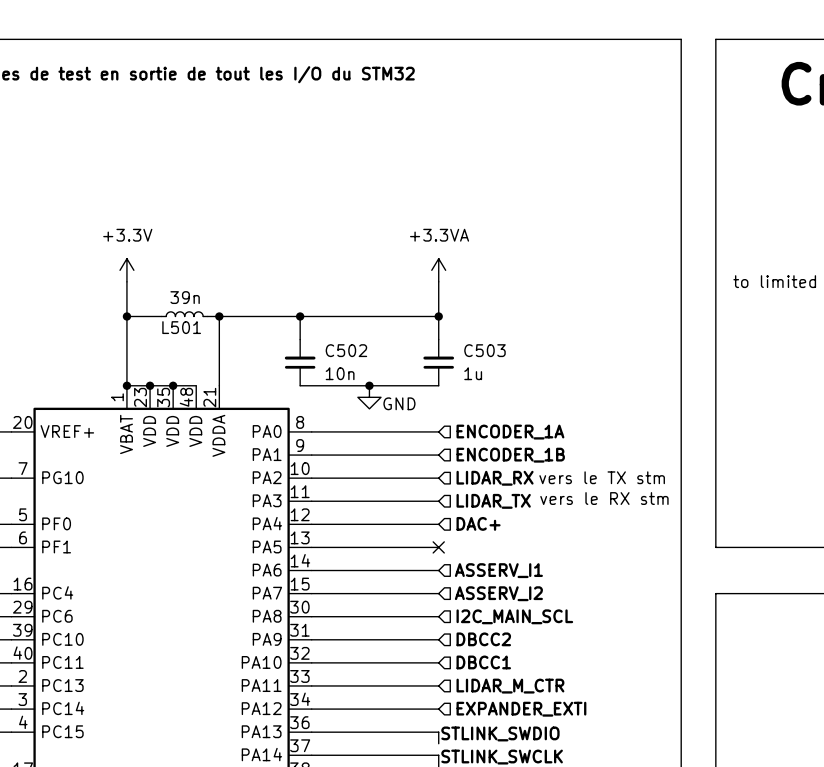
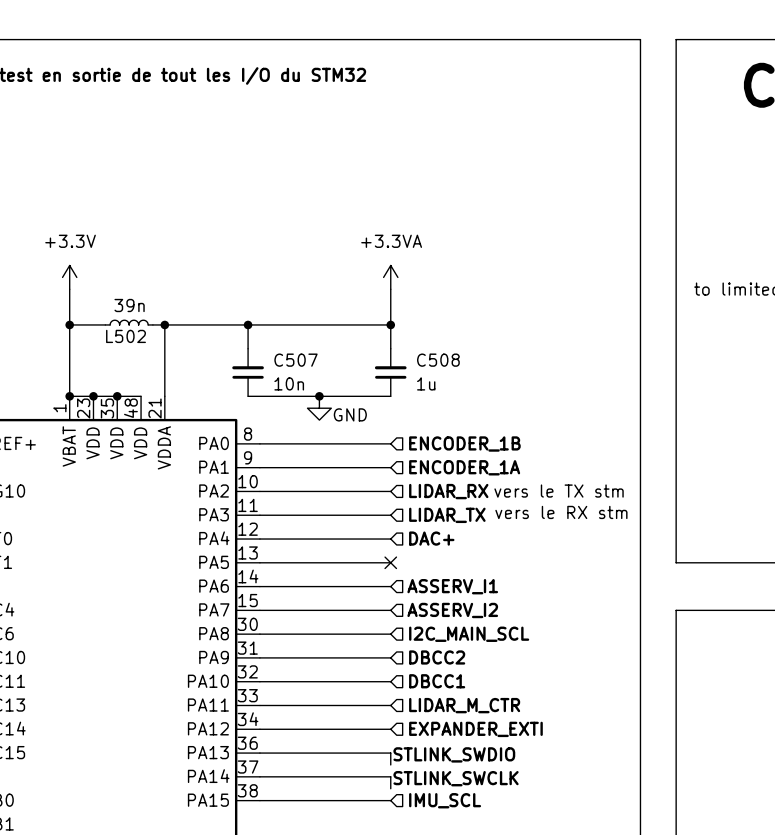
L501 name: L501 (181, 327) -> L502 (126, 336)
C502 name: C502 (346, 350) -> C507 (296, 360)
C503 name: C503 (484, 350) -> C508 (438, 360)
hierarchical label: ENCODER_1A (510, 432) -> ENCODER_1B (464, 444)
hierarchical label: ENCODER_1B (510, 455) -> ENCODER_1A (464, 467)

